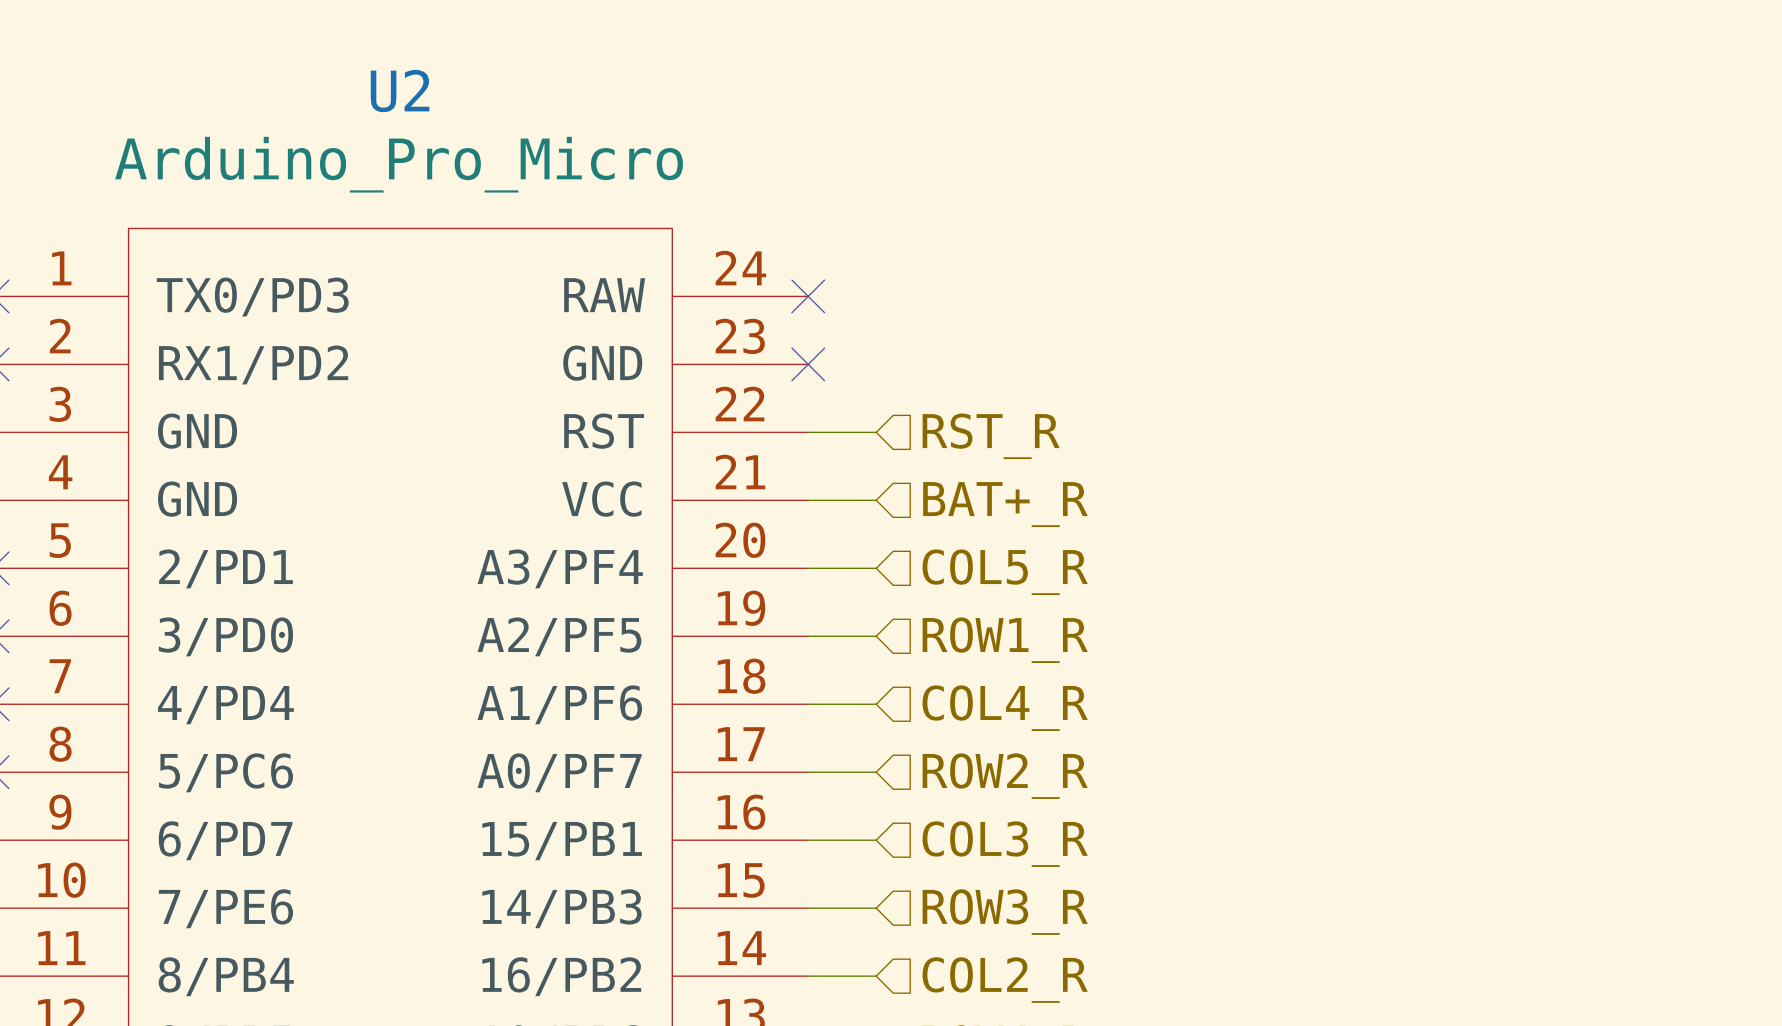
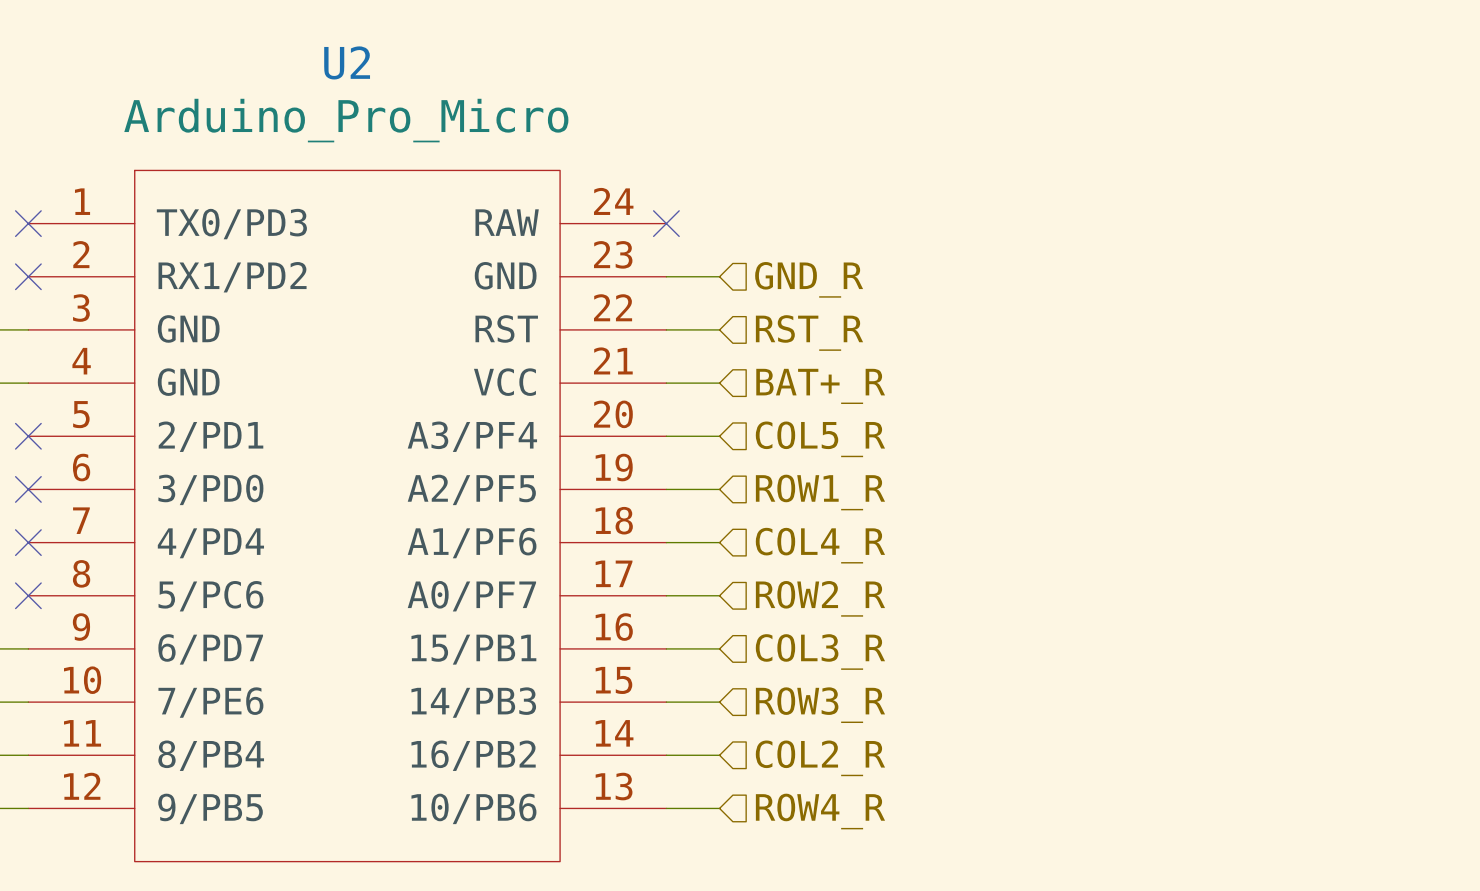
wire: none -> (666, 276) (719, 276)
no-connect mark: (808, 364) -> none
hierarchical label: none -> GND_R (809, 279)

